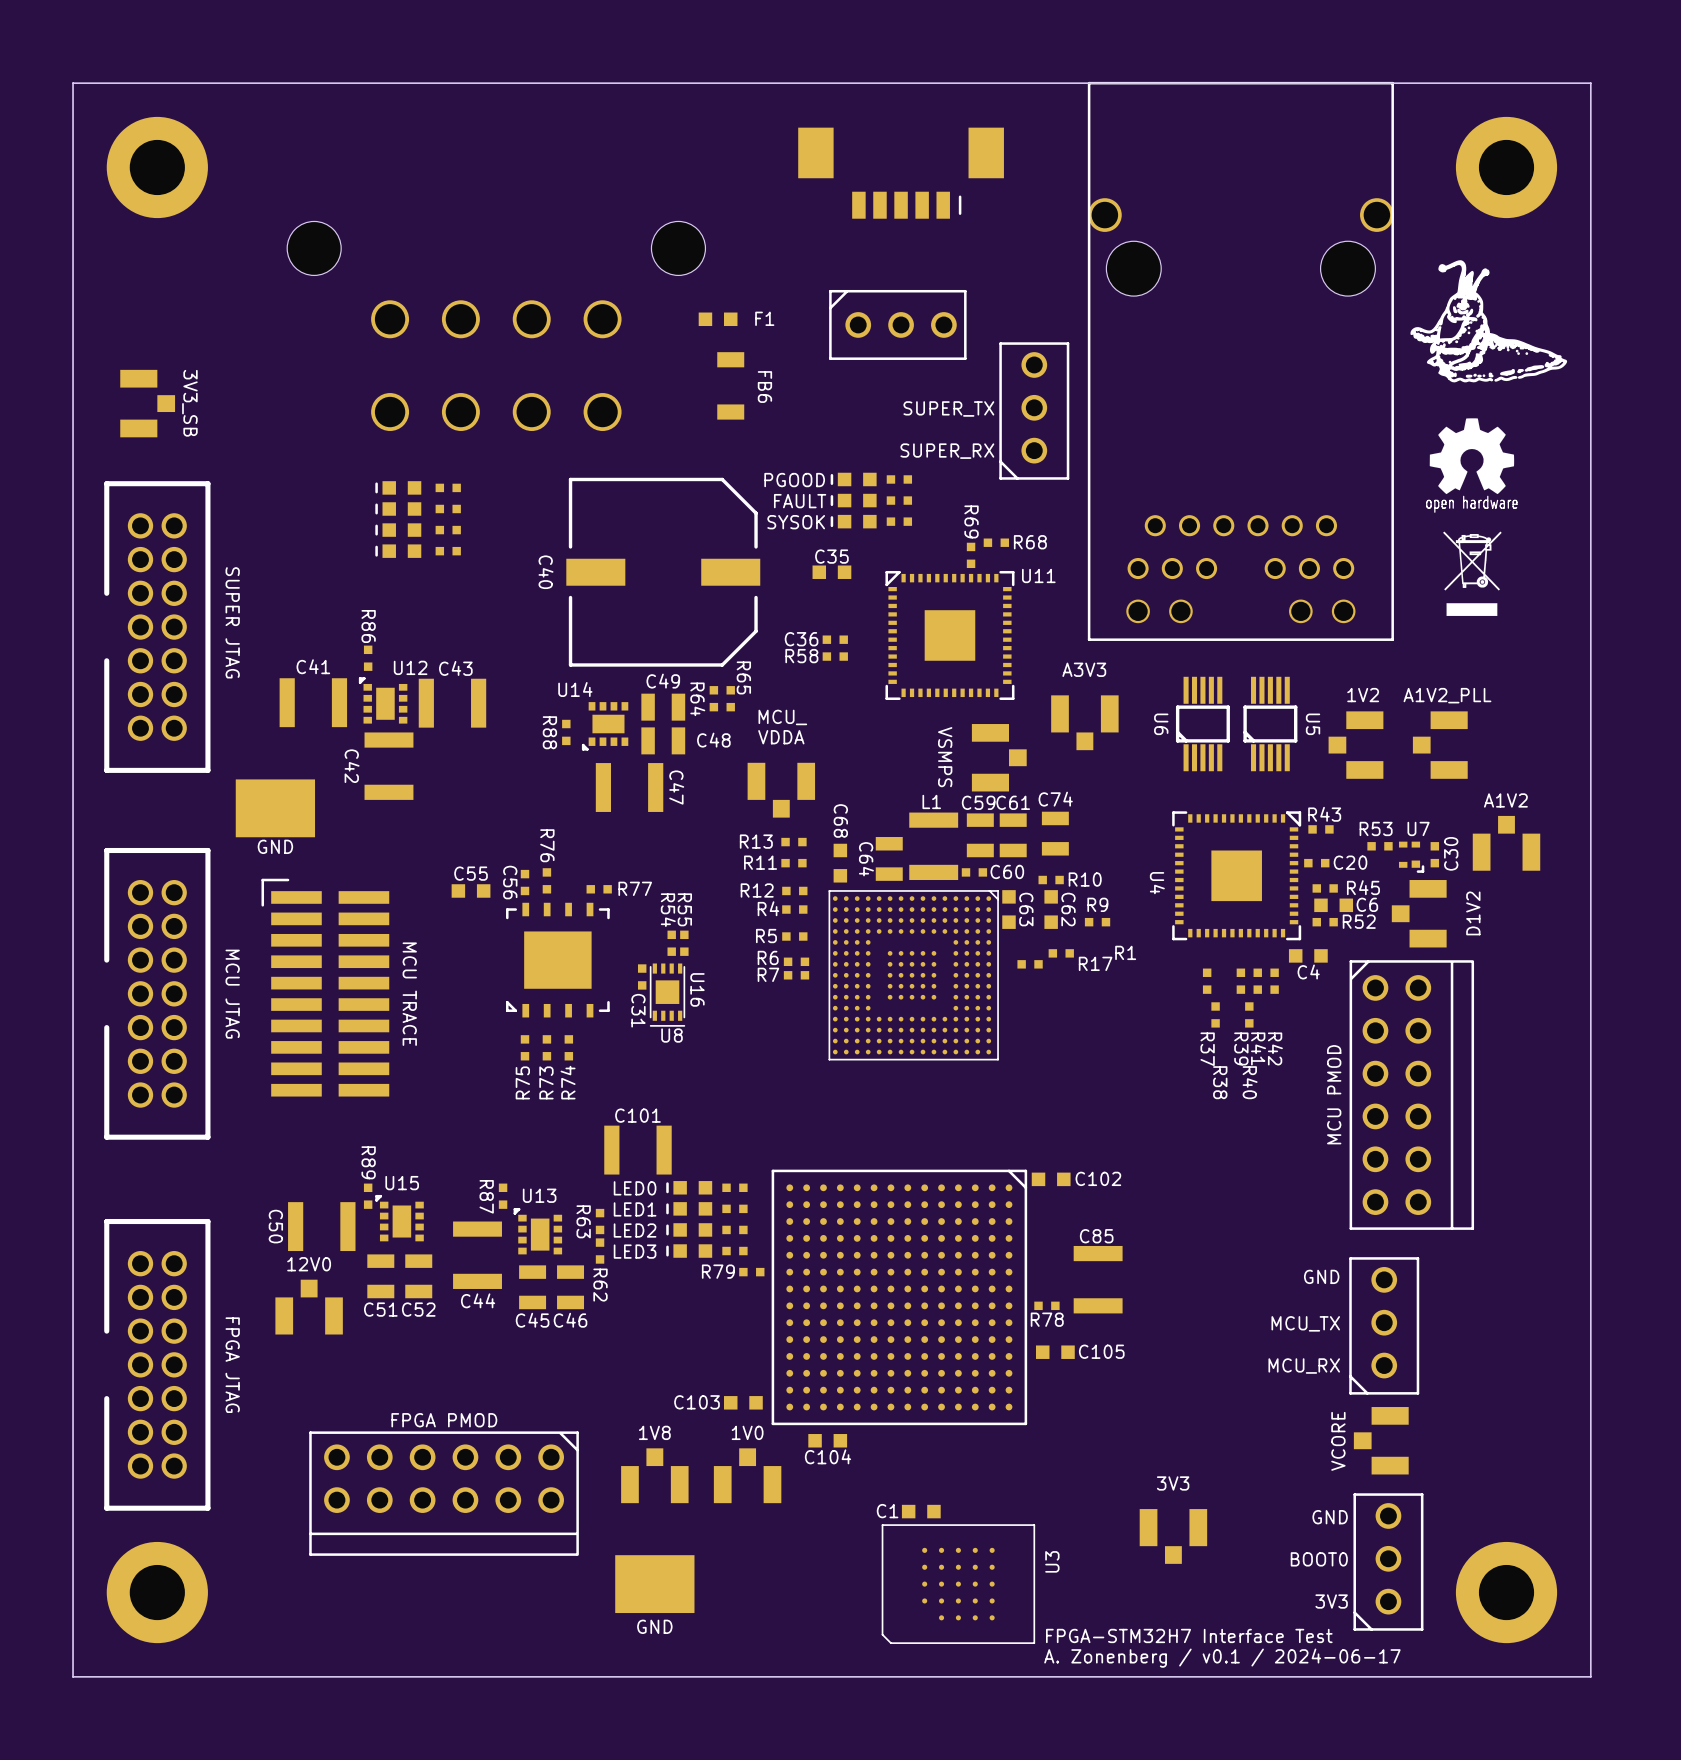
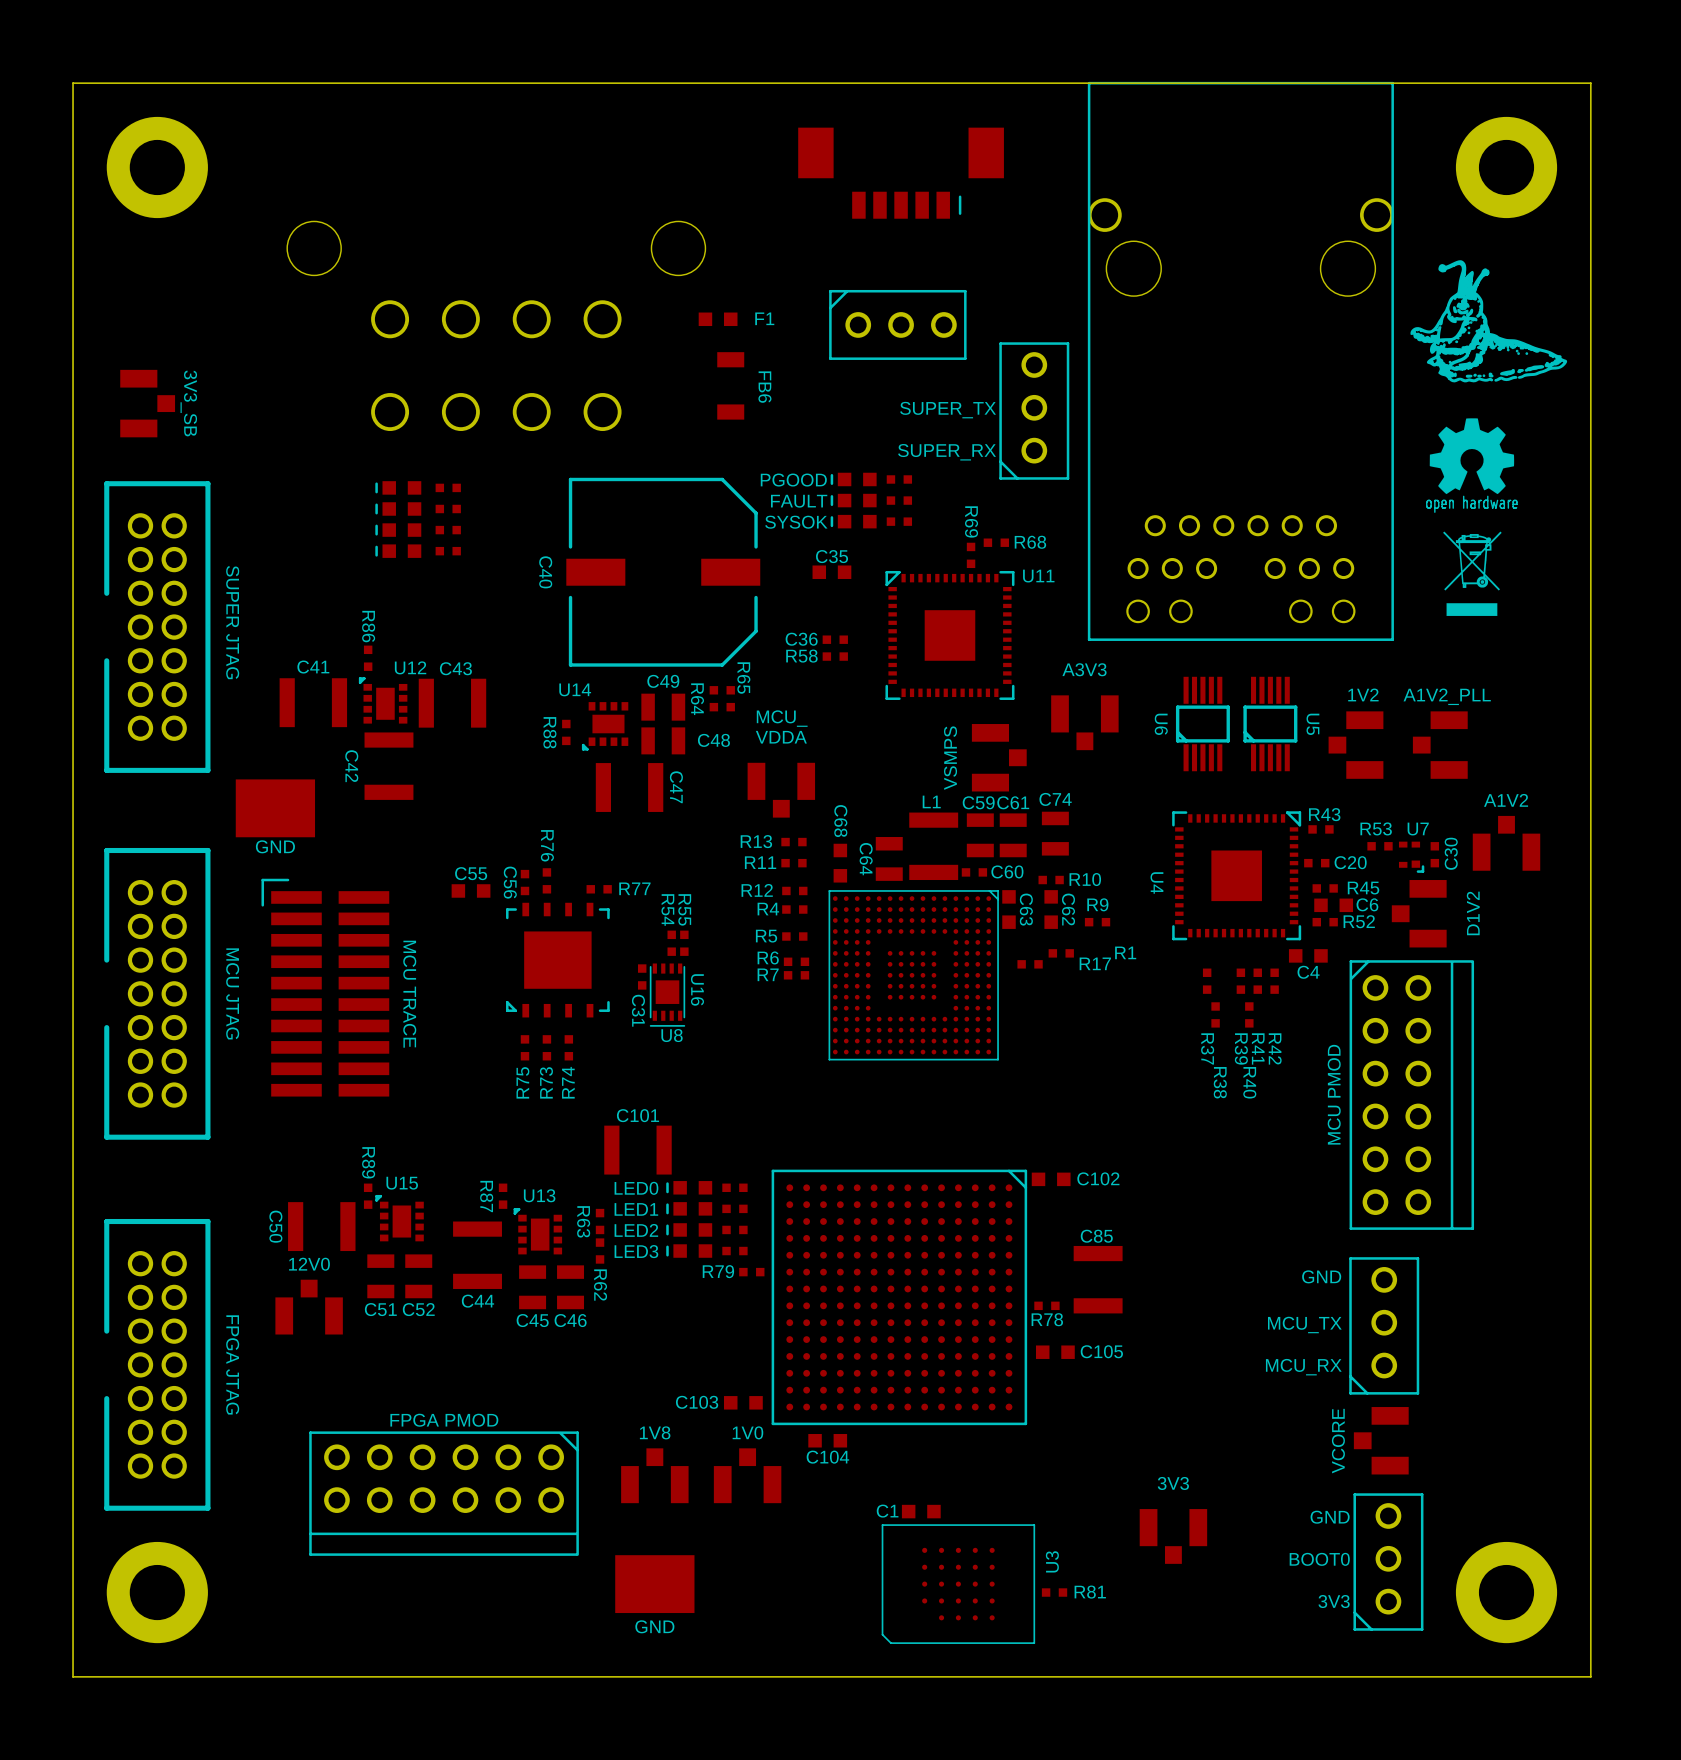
text rotation: 0° (945, 757) -> 180° (950, 758)
R81: none -> (1054, 1592)
text: FPGA-STM32H7 Interface Test (1189, 1635) -> none
text: A. Zonenberg / v0.1 / 2024-06-17 (1222, 1658) -> none

